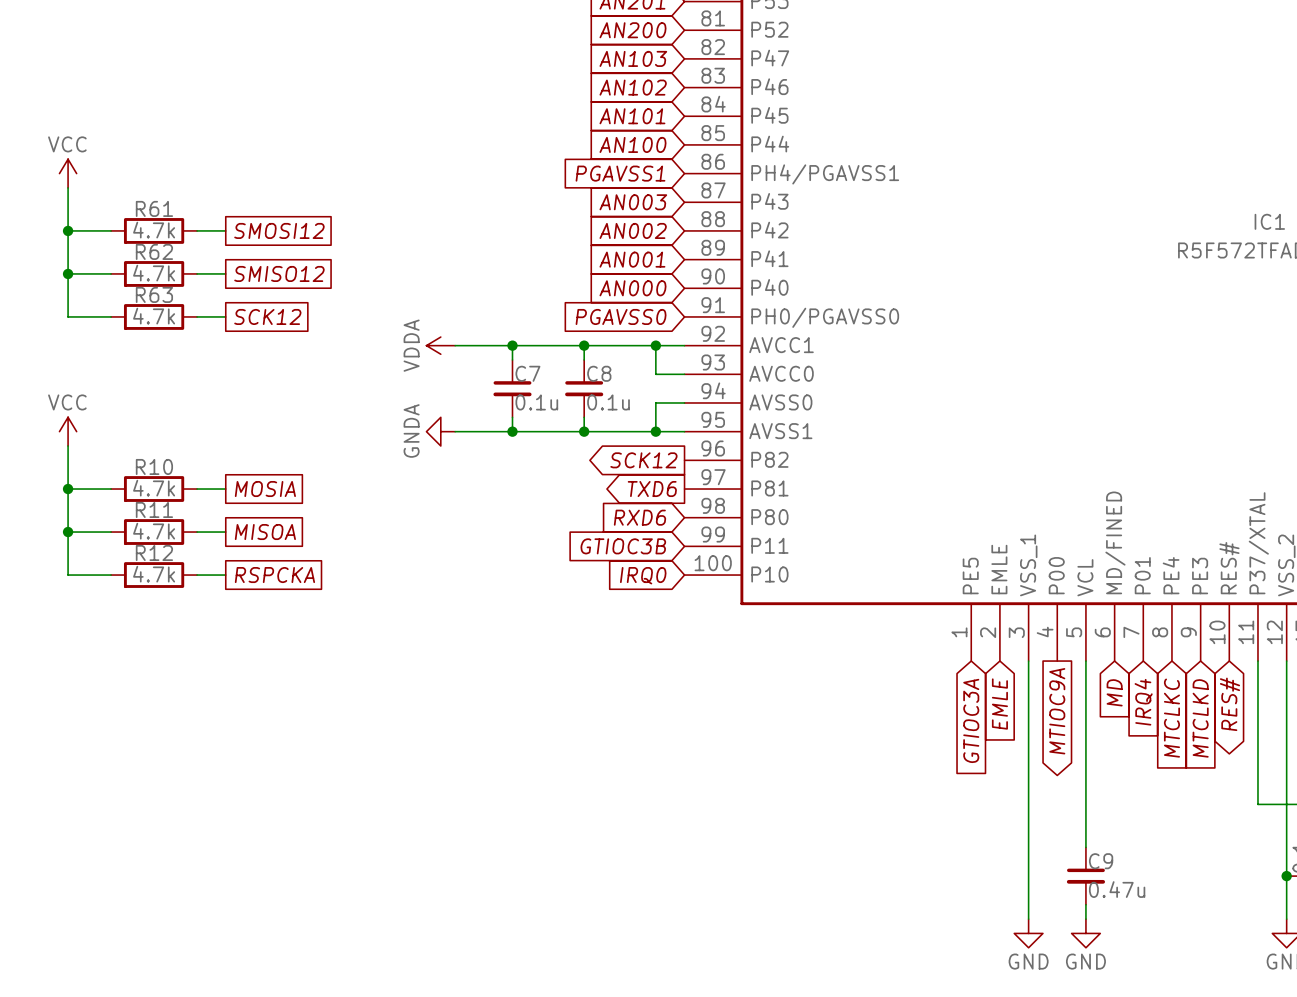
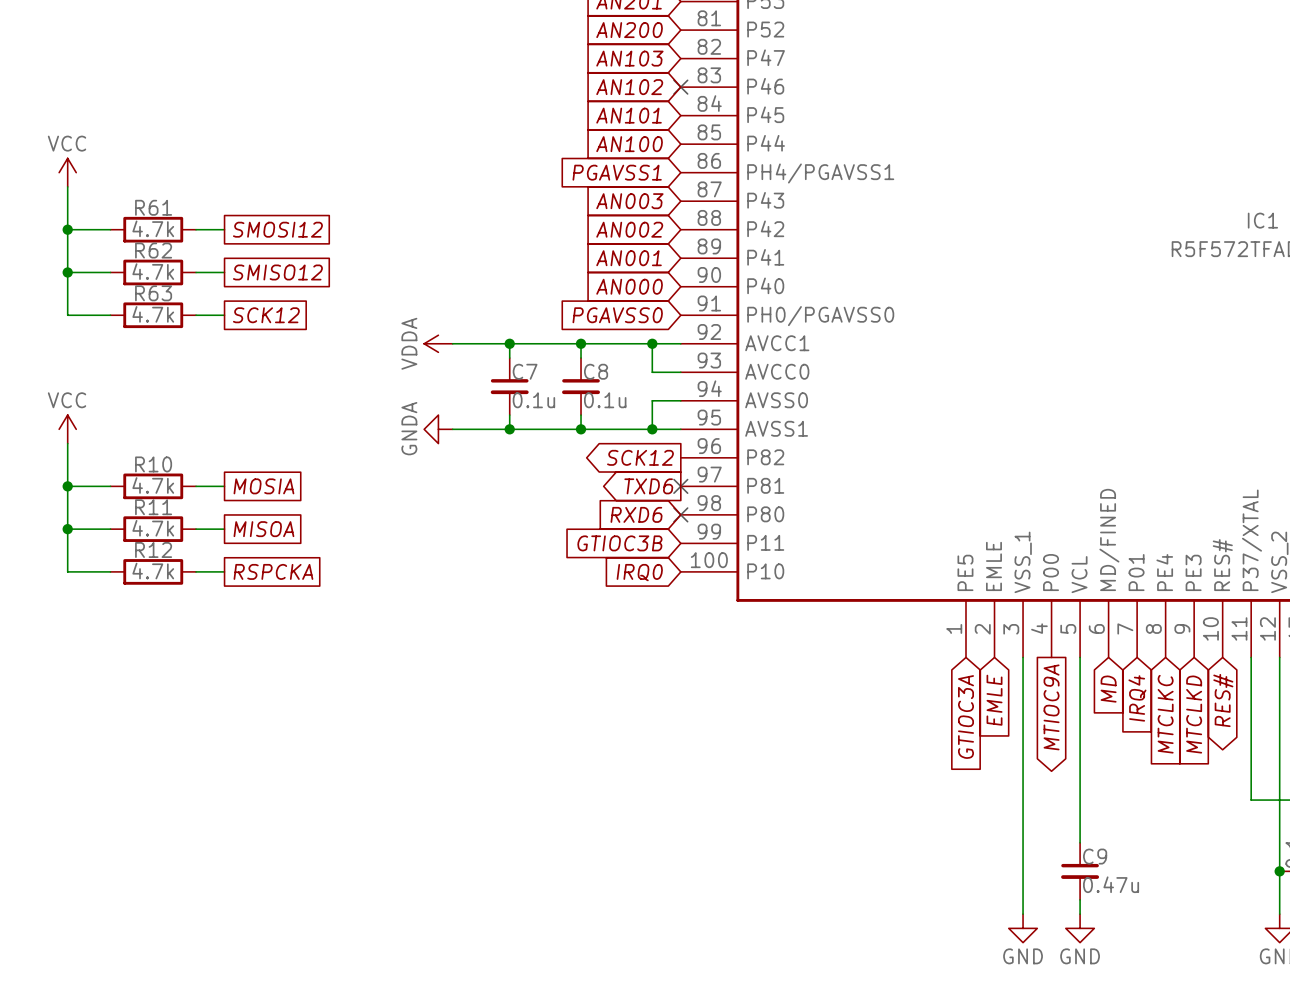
no-connect mark: none -> (680, 87)
no-connect mark: none -> (680, 486)
no-connect mark: none -> (680, 514)

